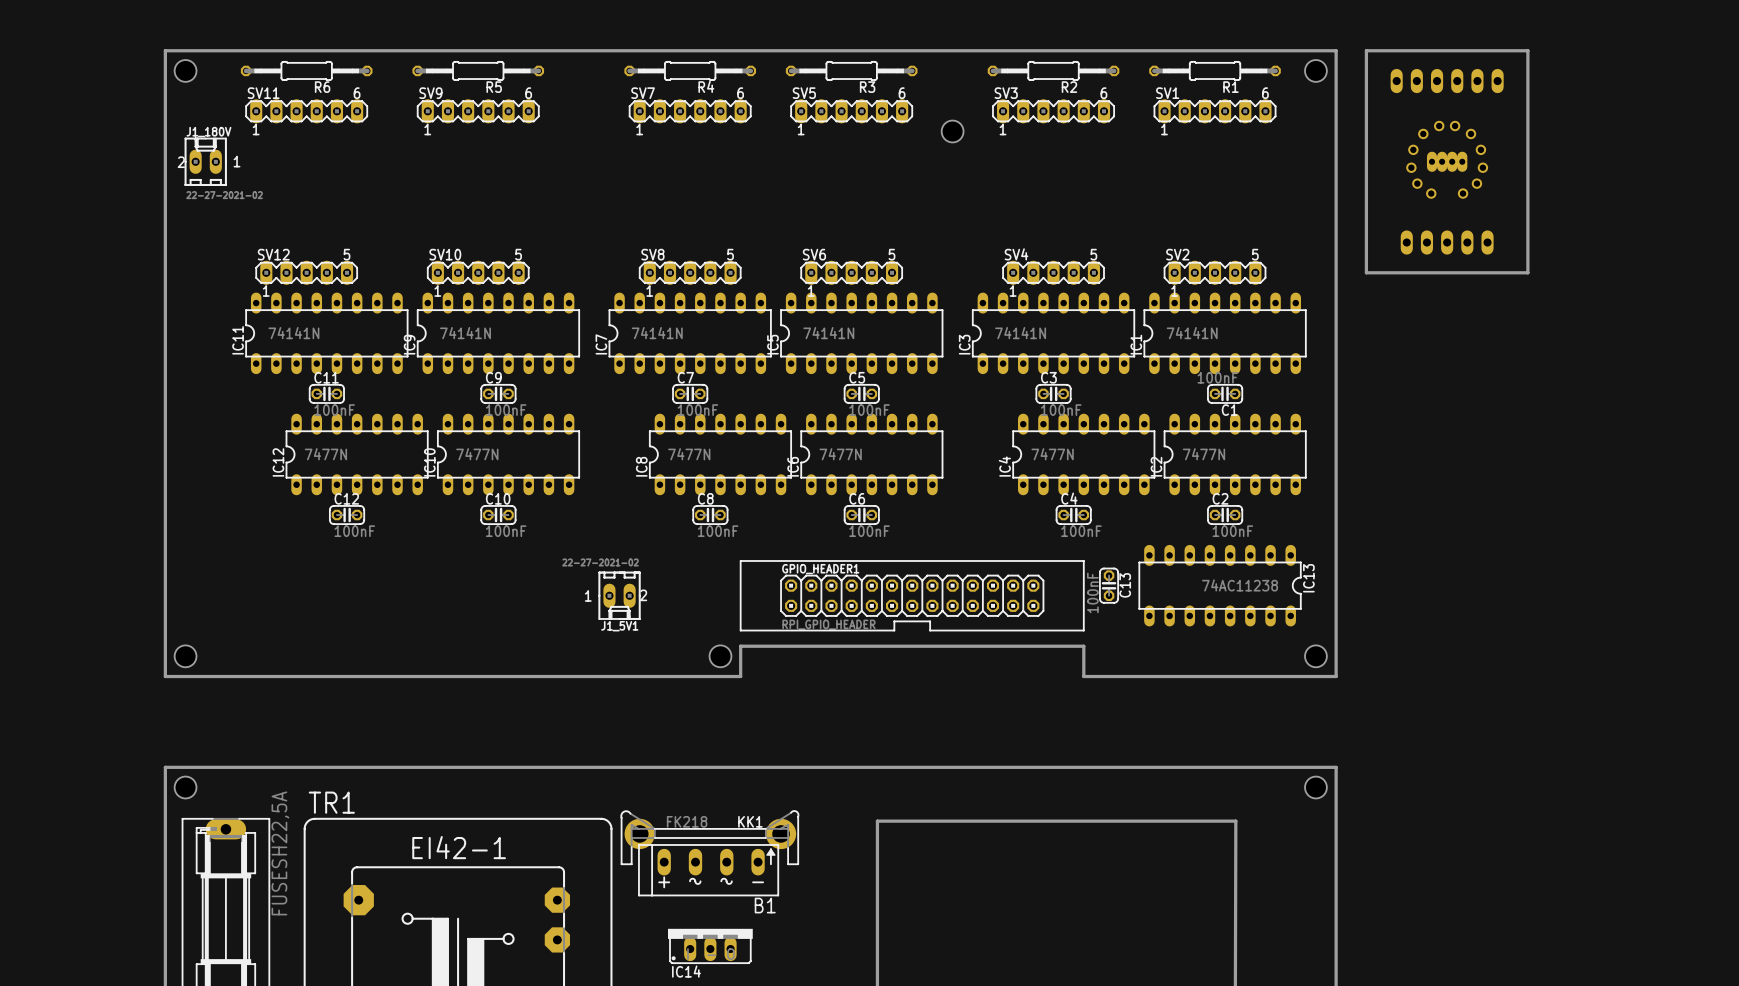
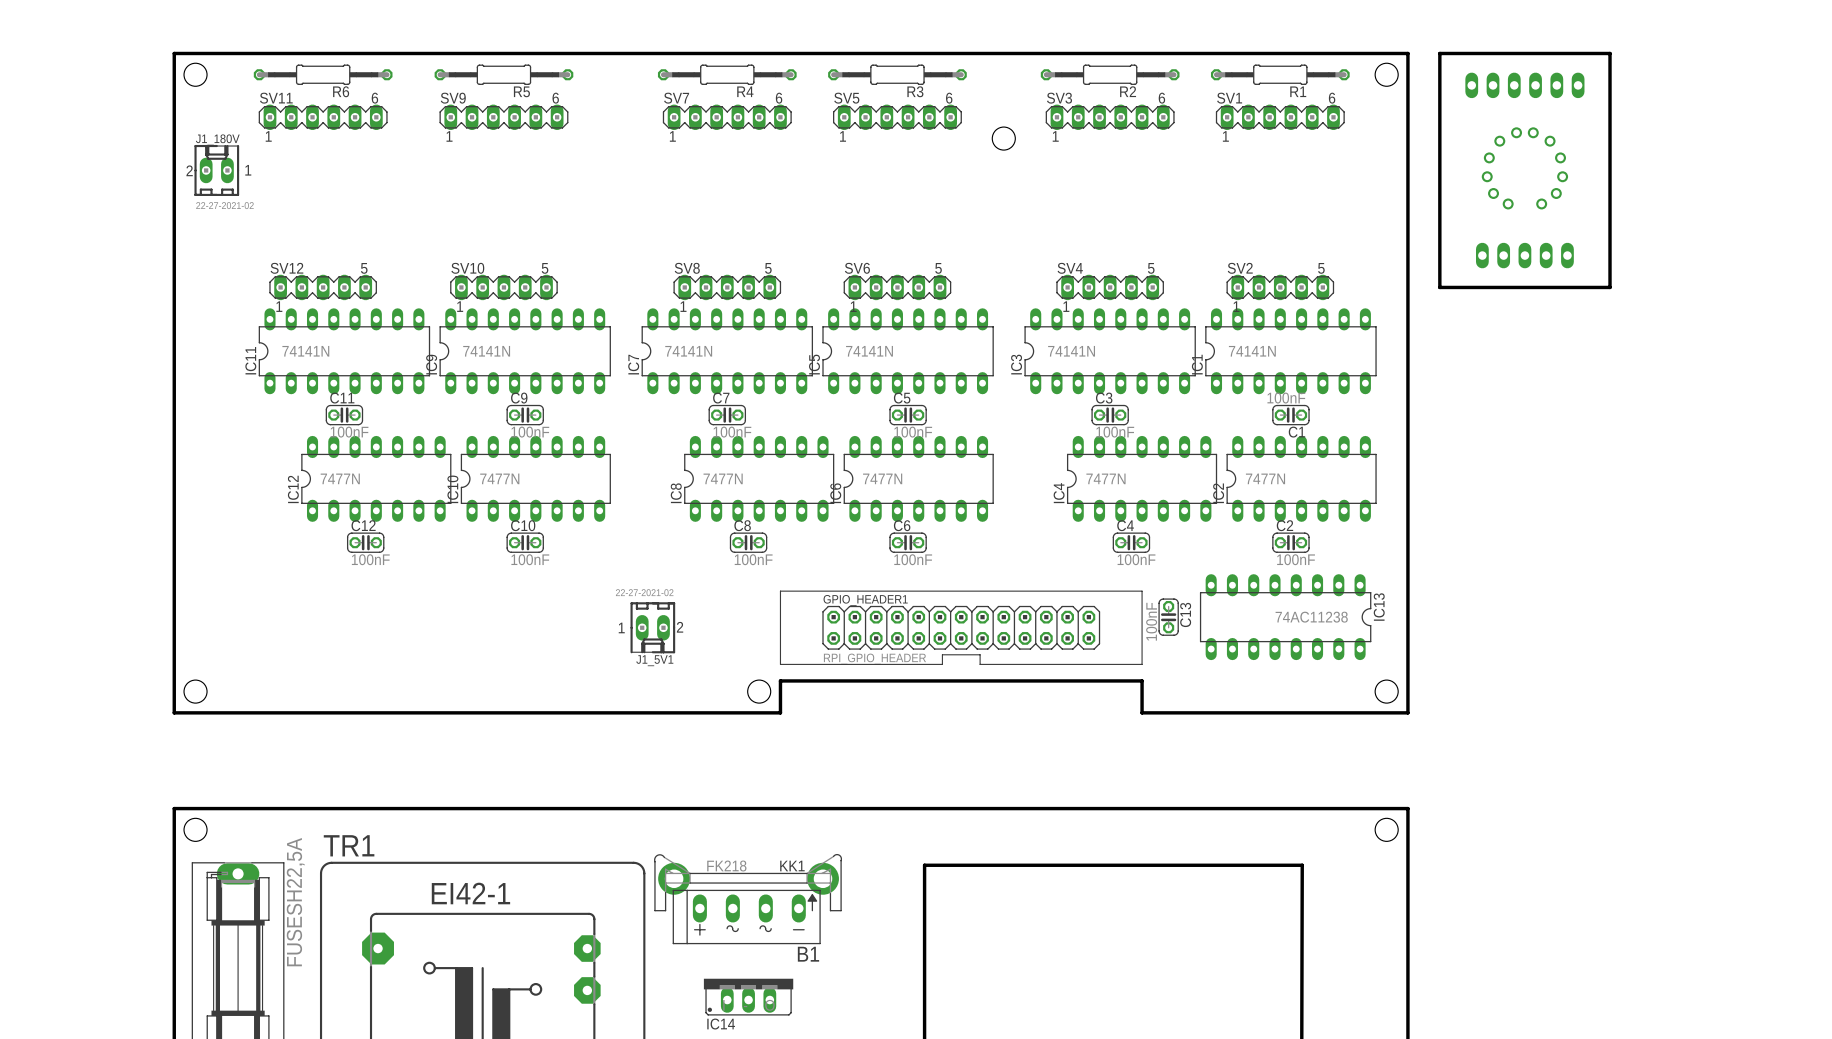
part: (1447, 161) -> none

